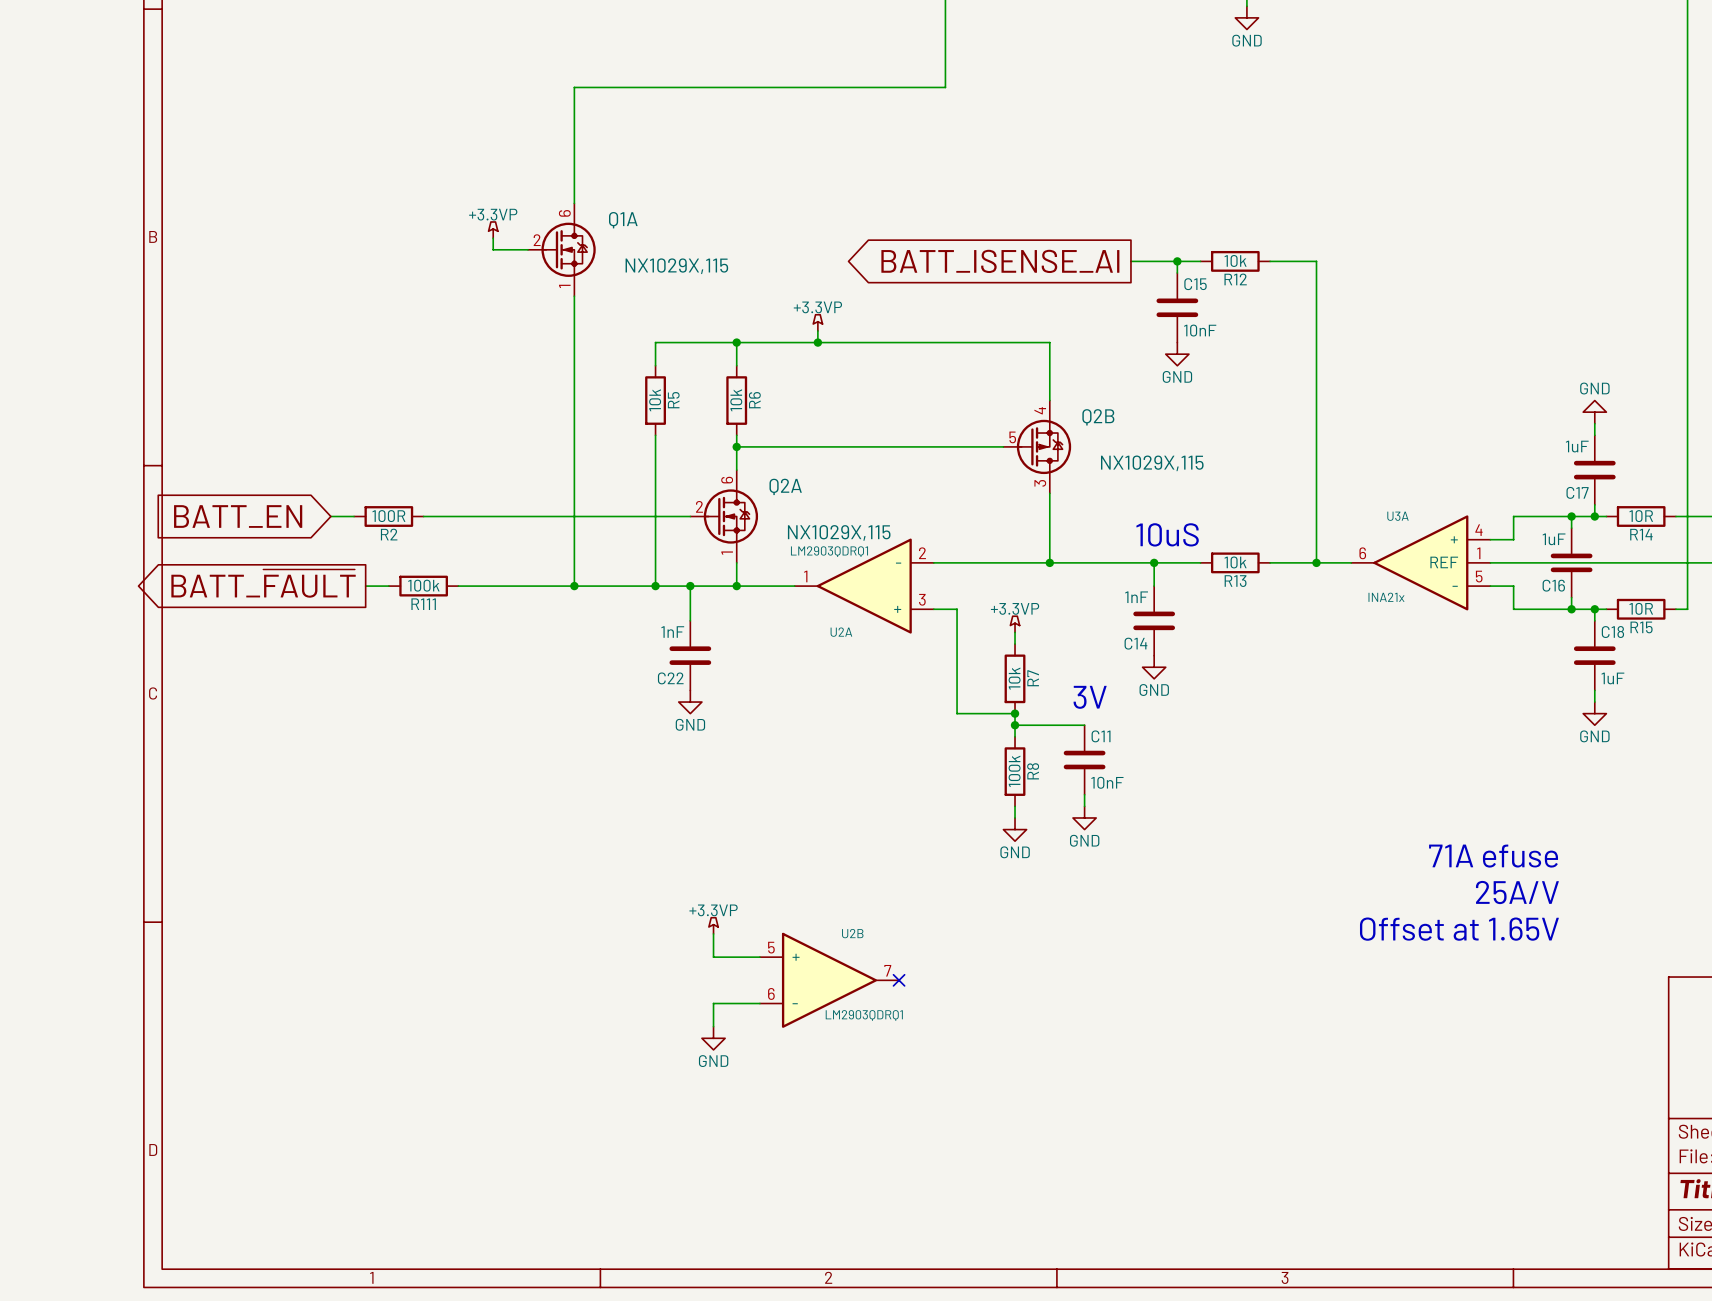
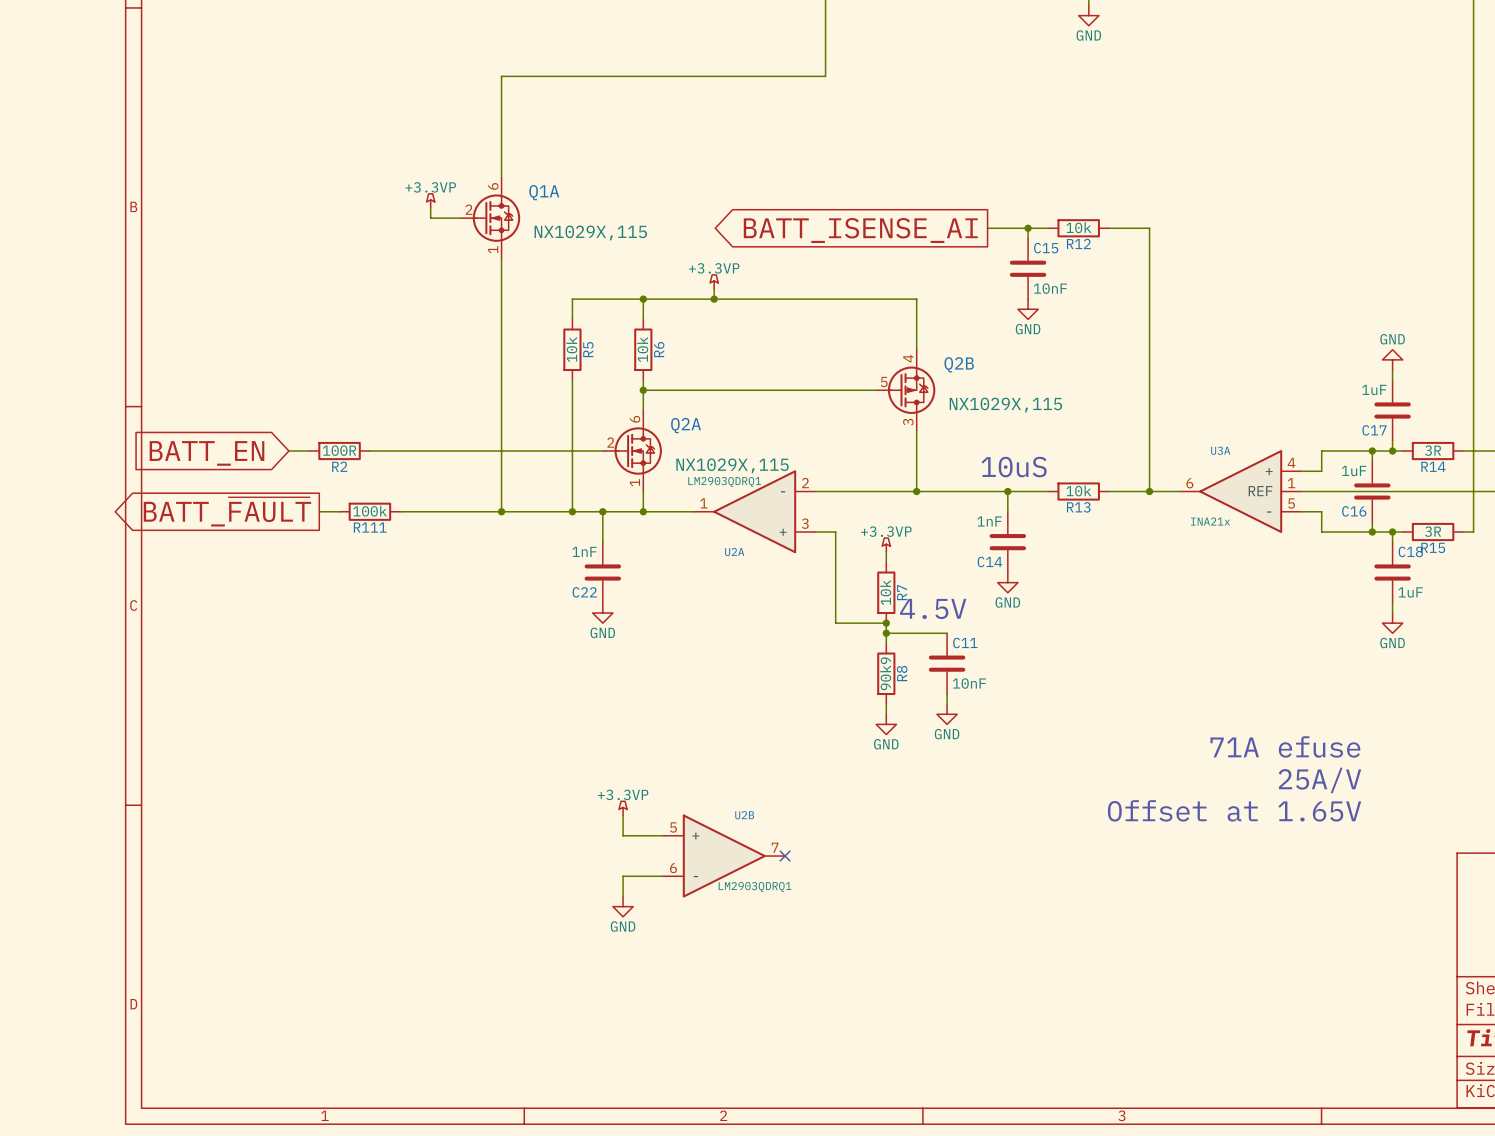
R14 value: 10R (1641, 516) -> 3R (1433, 450)
R15 value: 10R (1641, 608) -> 3R (1433, 531)
text: 3V (1090, 697) -> 4.5V (933, 608)
R8 value: 100k (1014, 771) -> 90k9 (885, 673)

